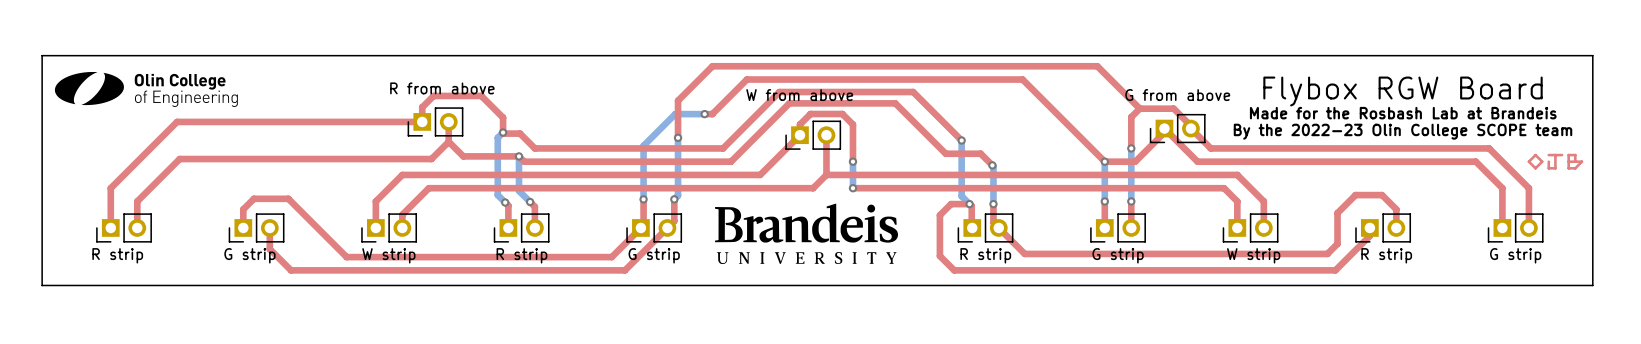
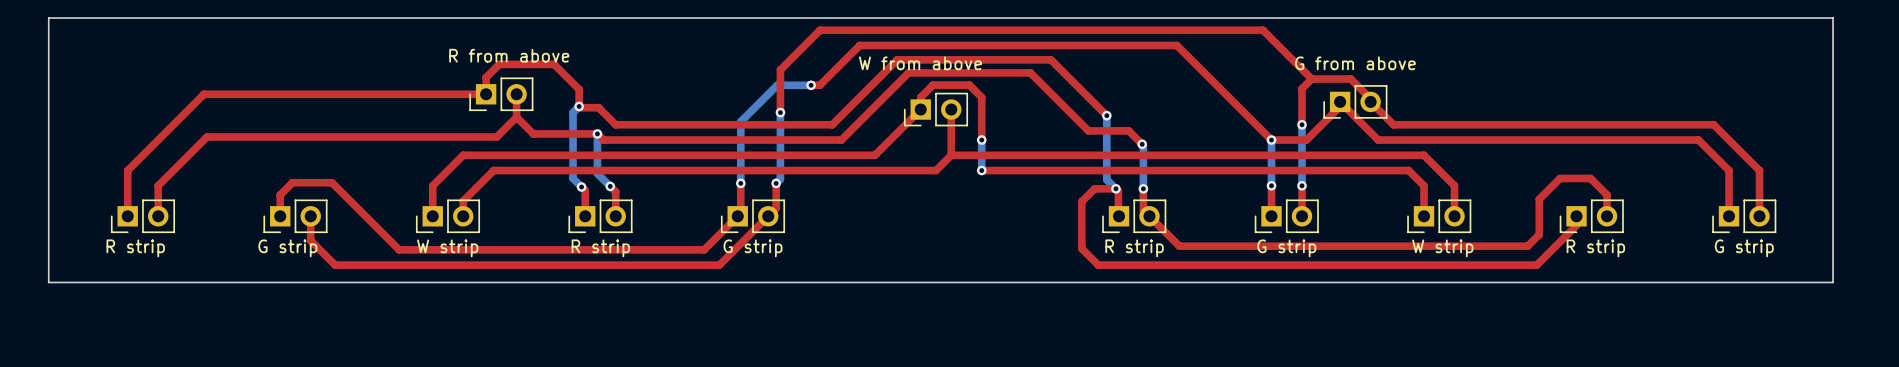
drawing: [54, 71, 238, 107] -> none
text: Flybox RGW Board (1403, 91) -> none
text: Made for the Rosbash Lab at Brandeis (1403, 113) -> none
text: By the 2022-23 Olin College SCOPE team (1403, 131) -> none
top track: (1535, 155) (1528, 161) (1535, 168) (1542, 161) (1535, 155) -> none
top track: (1548, 155) (1562, 155) -> none
top track: (1555, 155) (1555, 168) (1548, 168) (1548, 161) -> none
top track: (1568, 161) (1581, 161) (1575, 168) (1568, 168) (1568, 155) (1575, 155) (1575, 161) -> none
drawing: [715, 203, 899, 265] -> none

